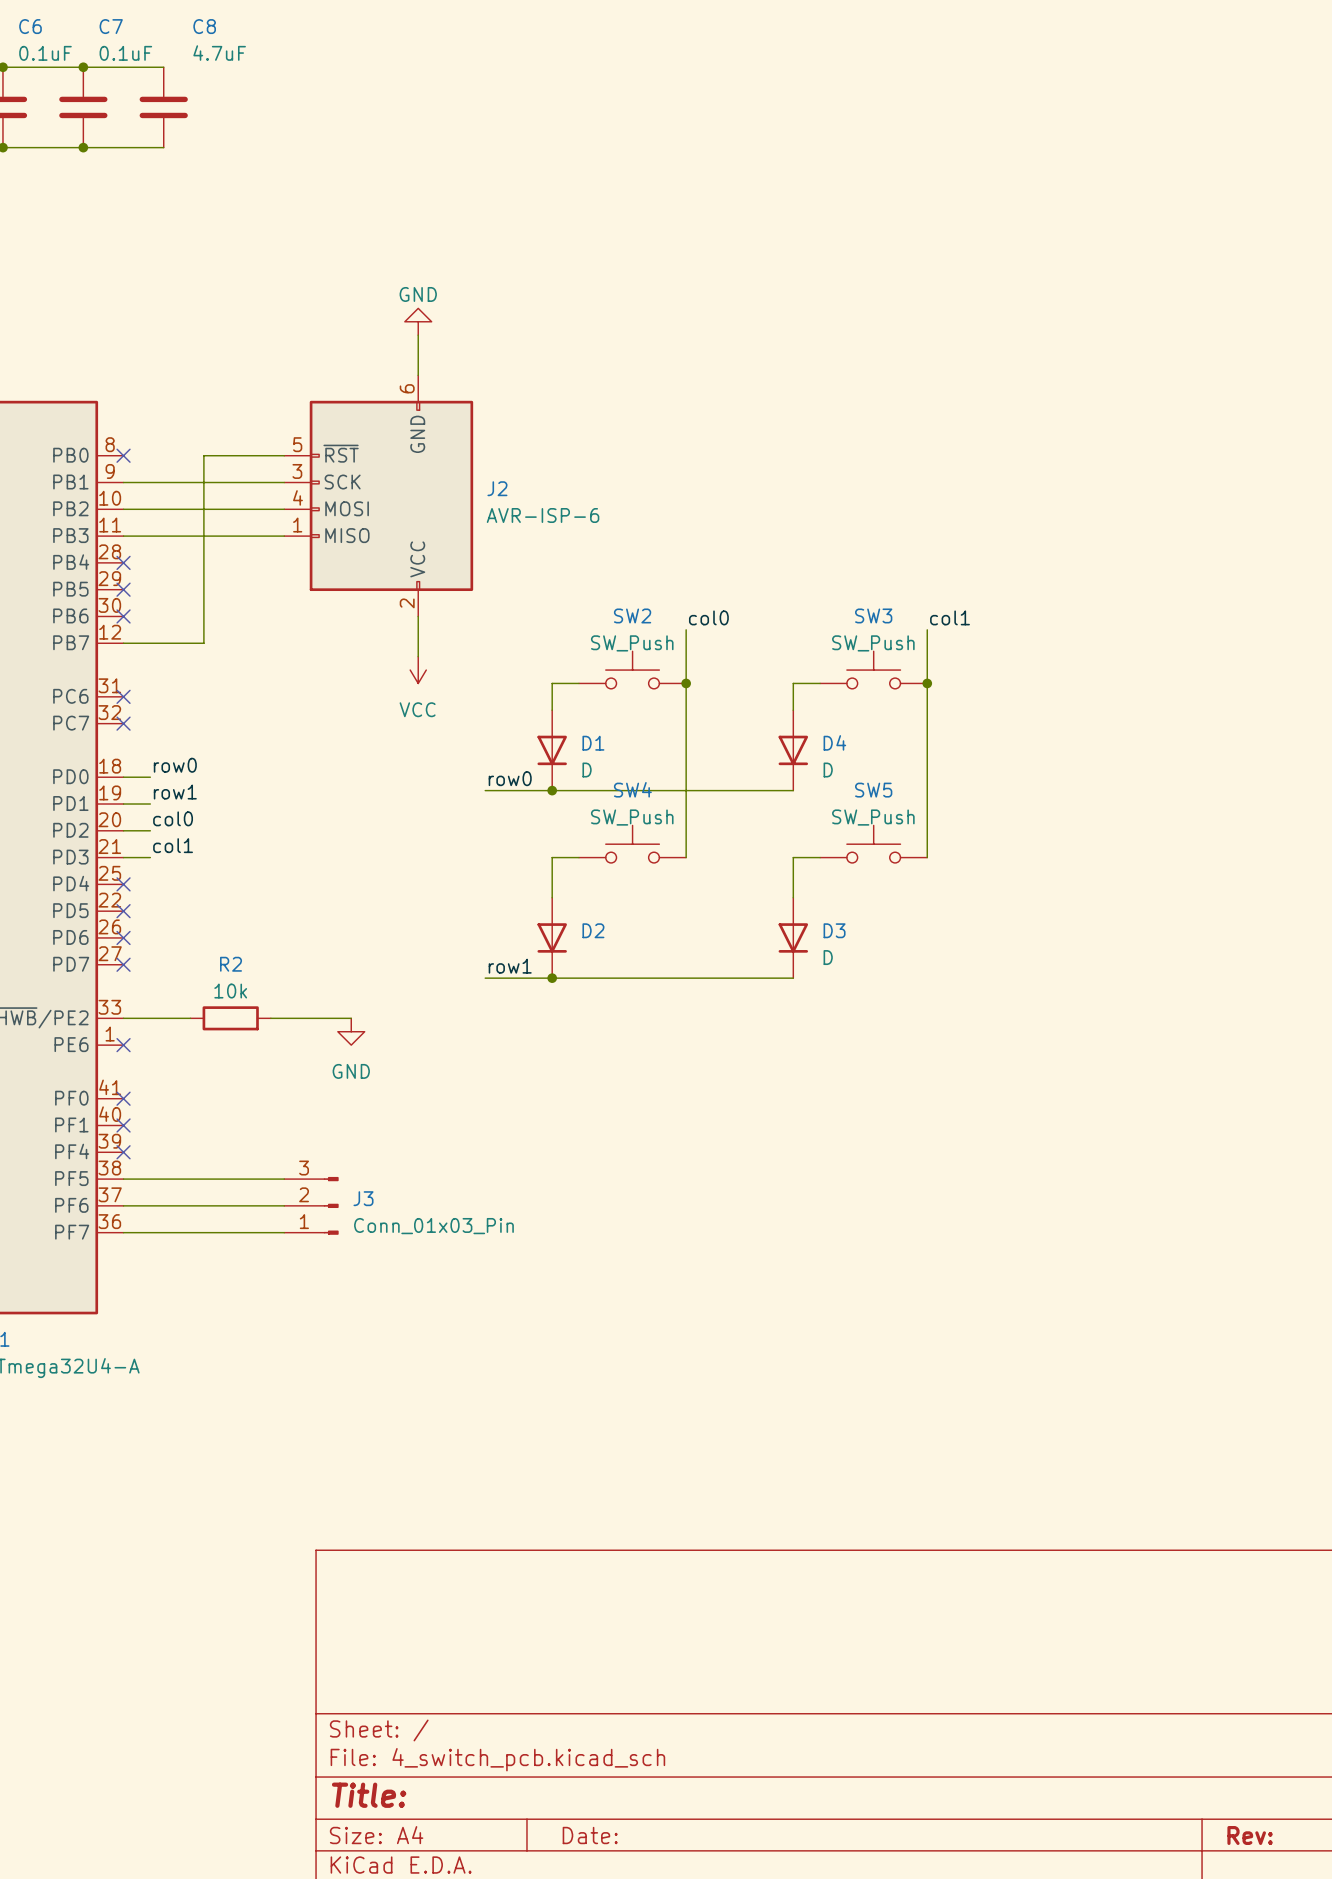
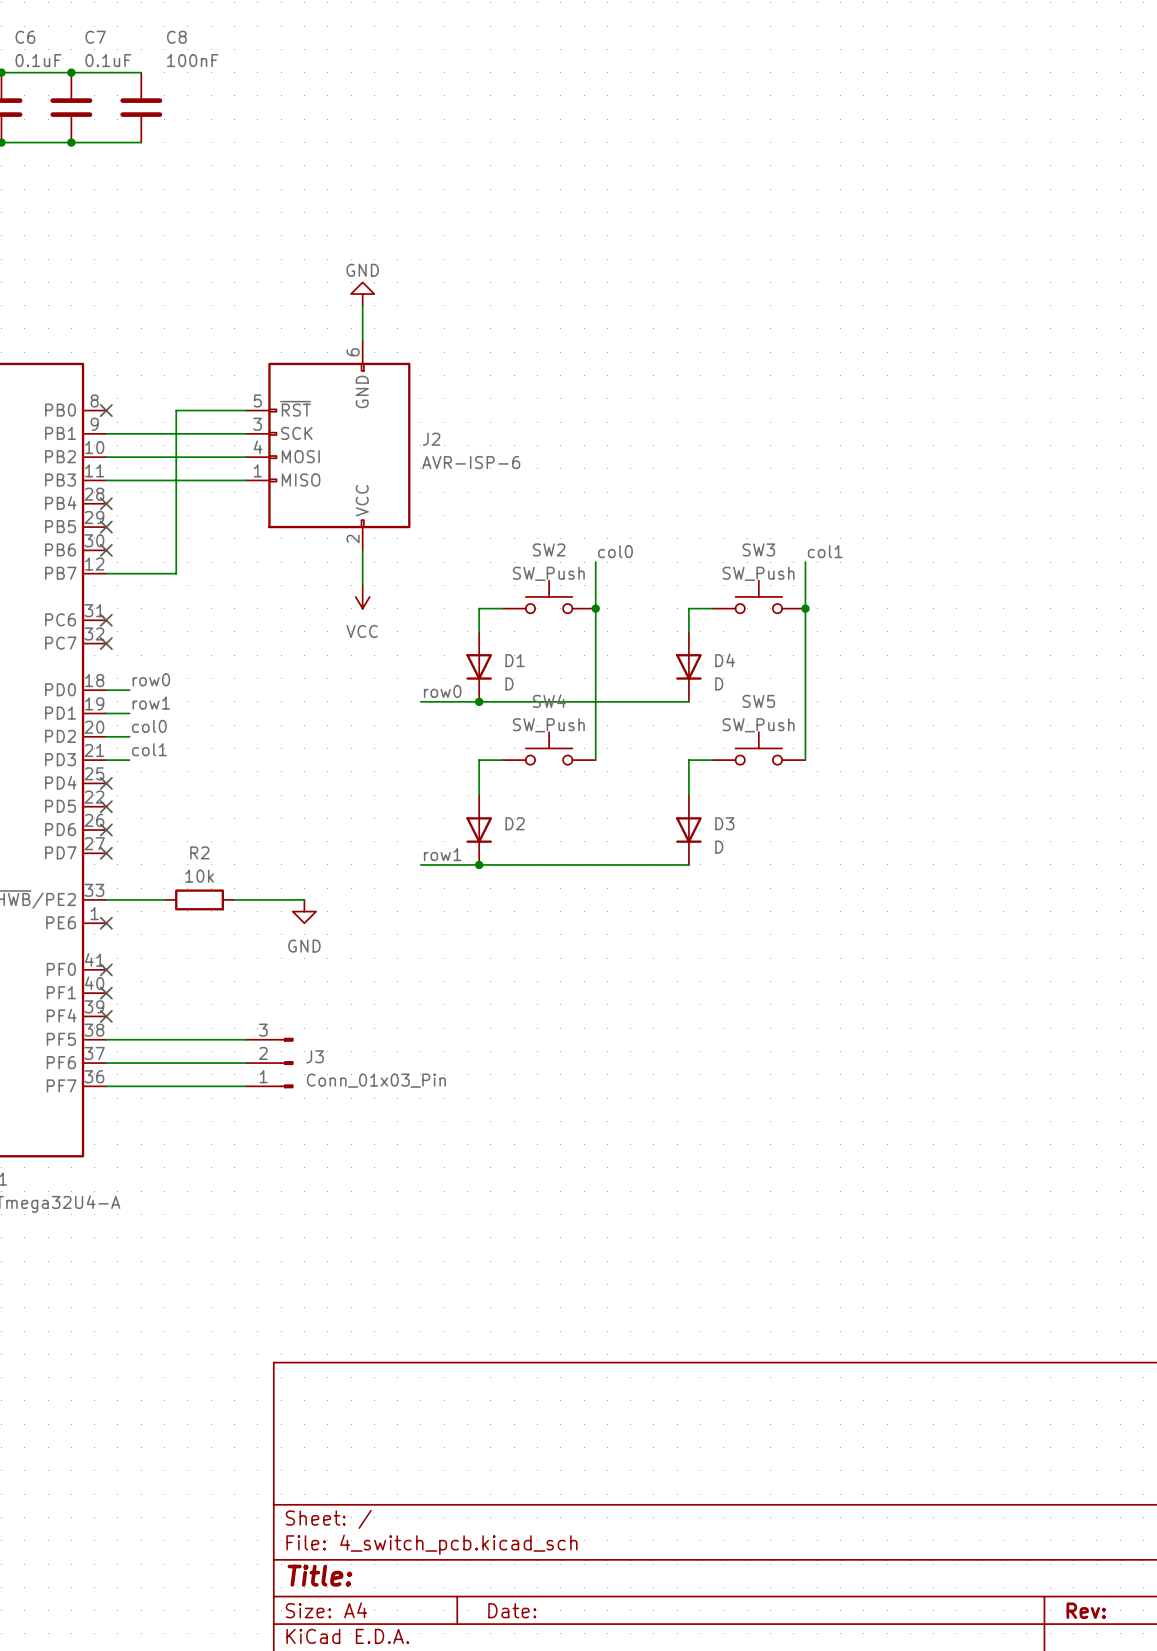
C8 value: 4.7uF (219, 53) -> 100nF (192, 60)

